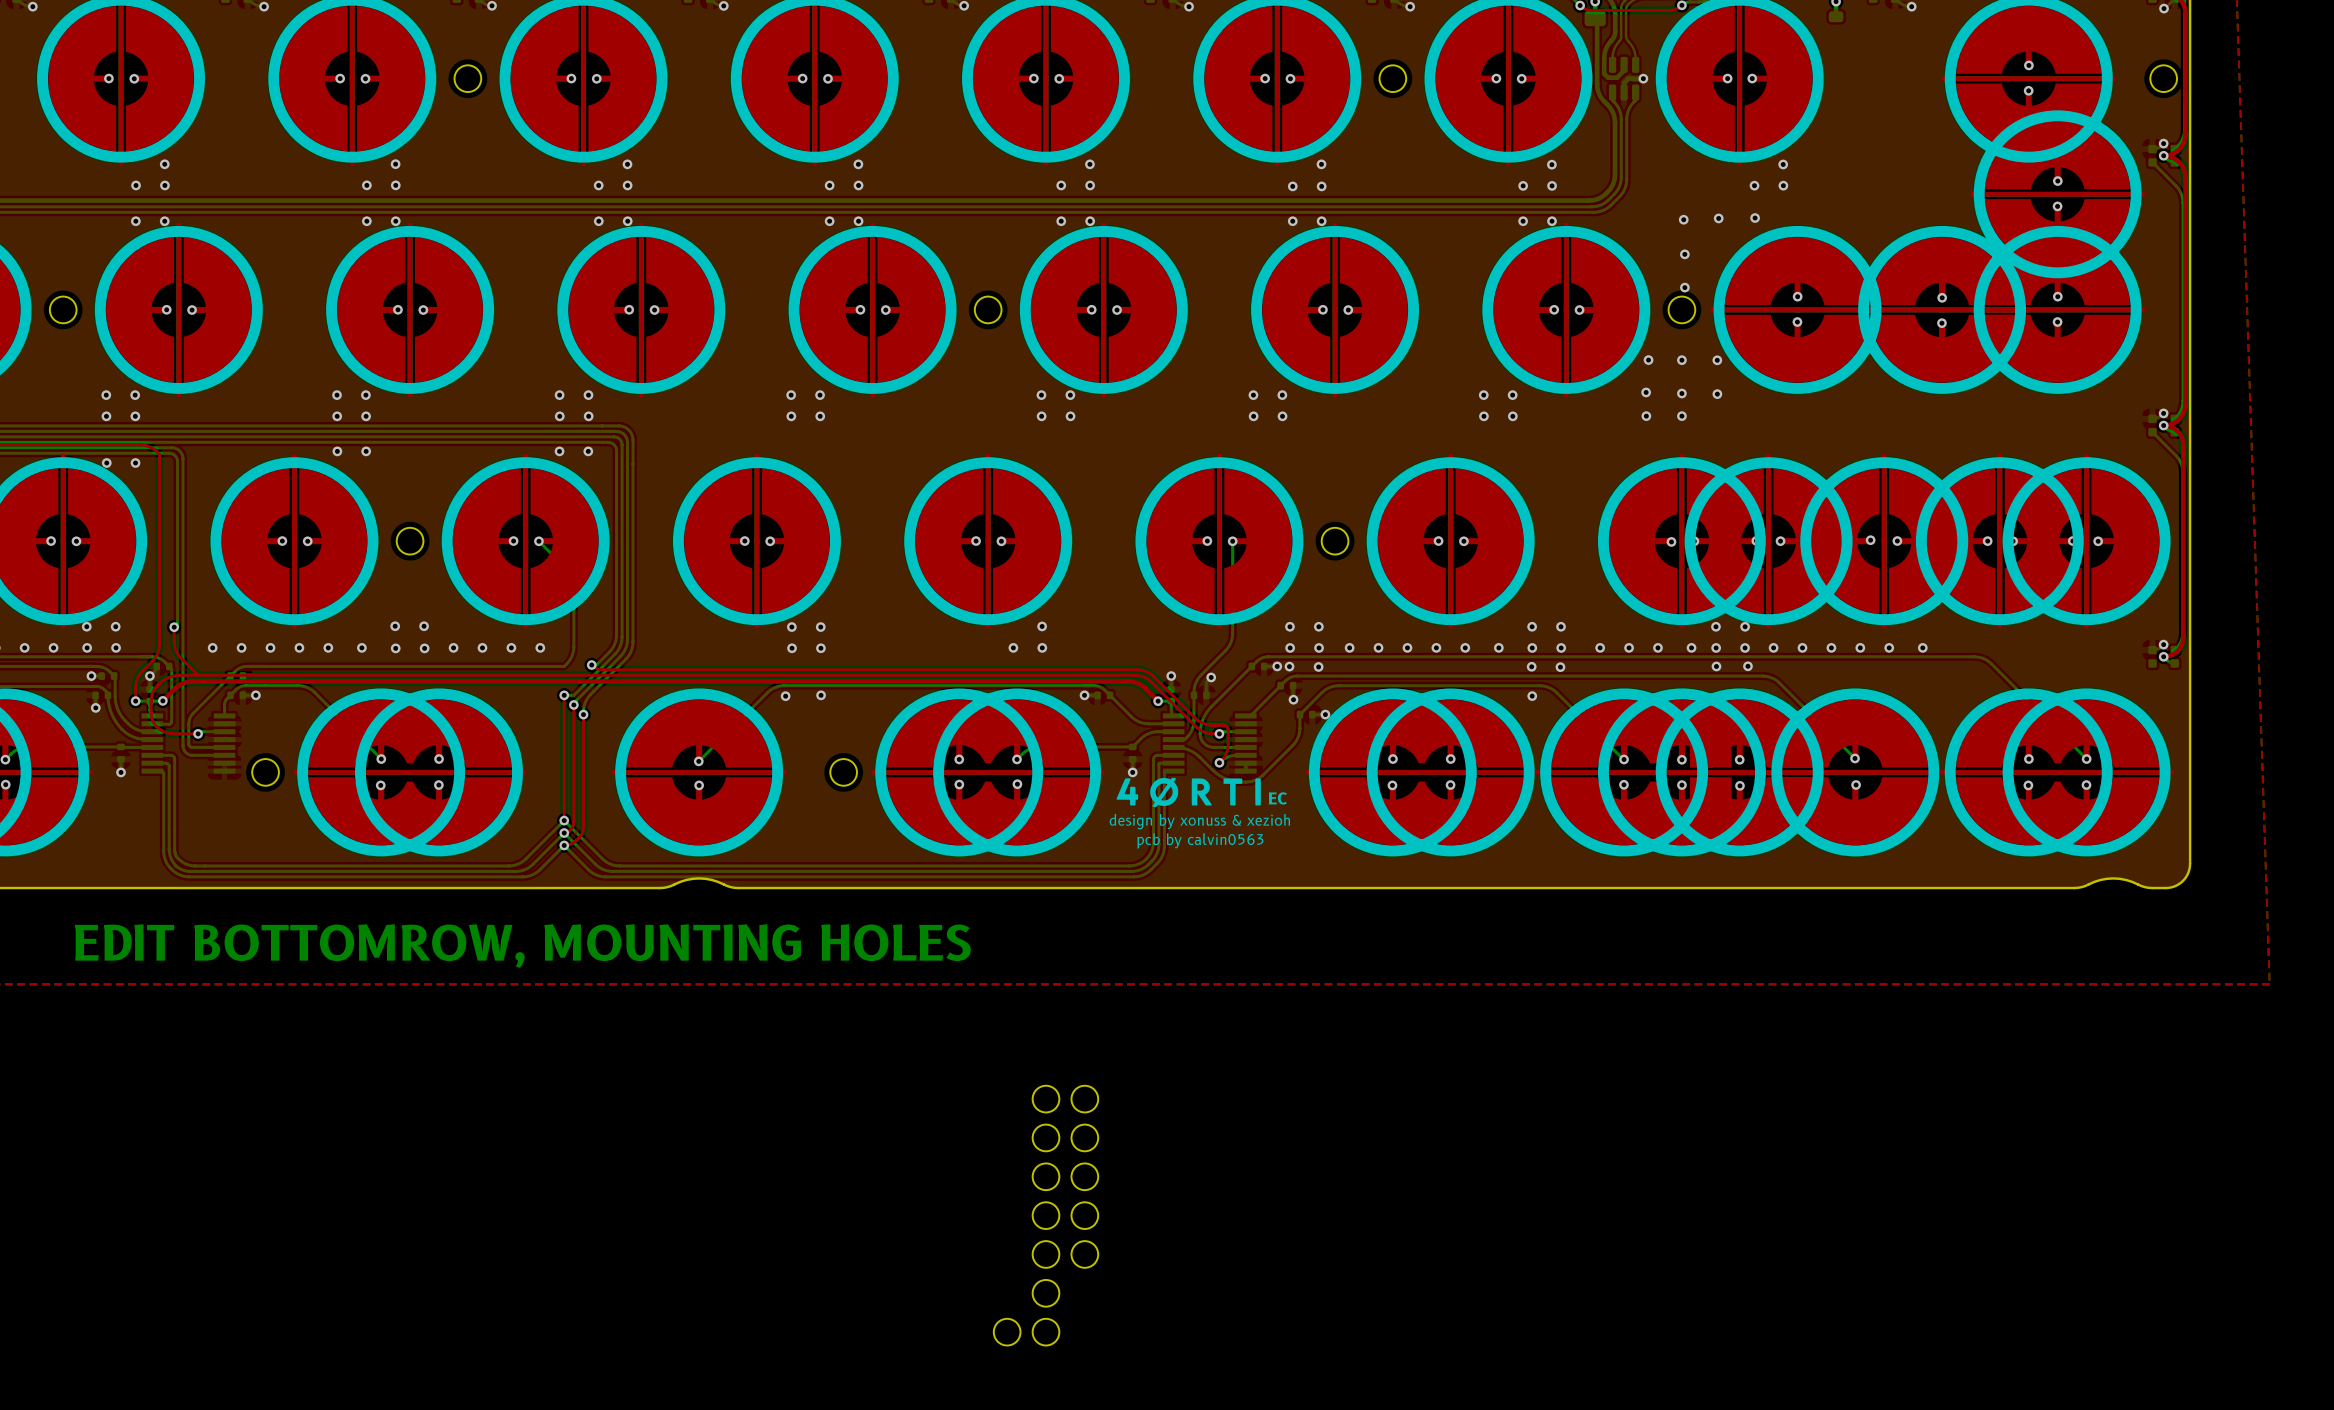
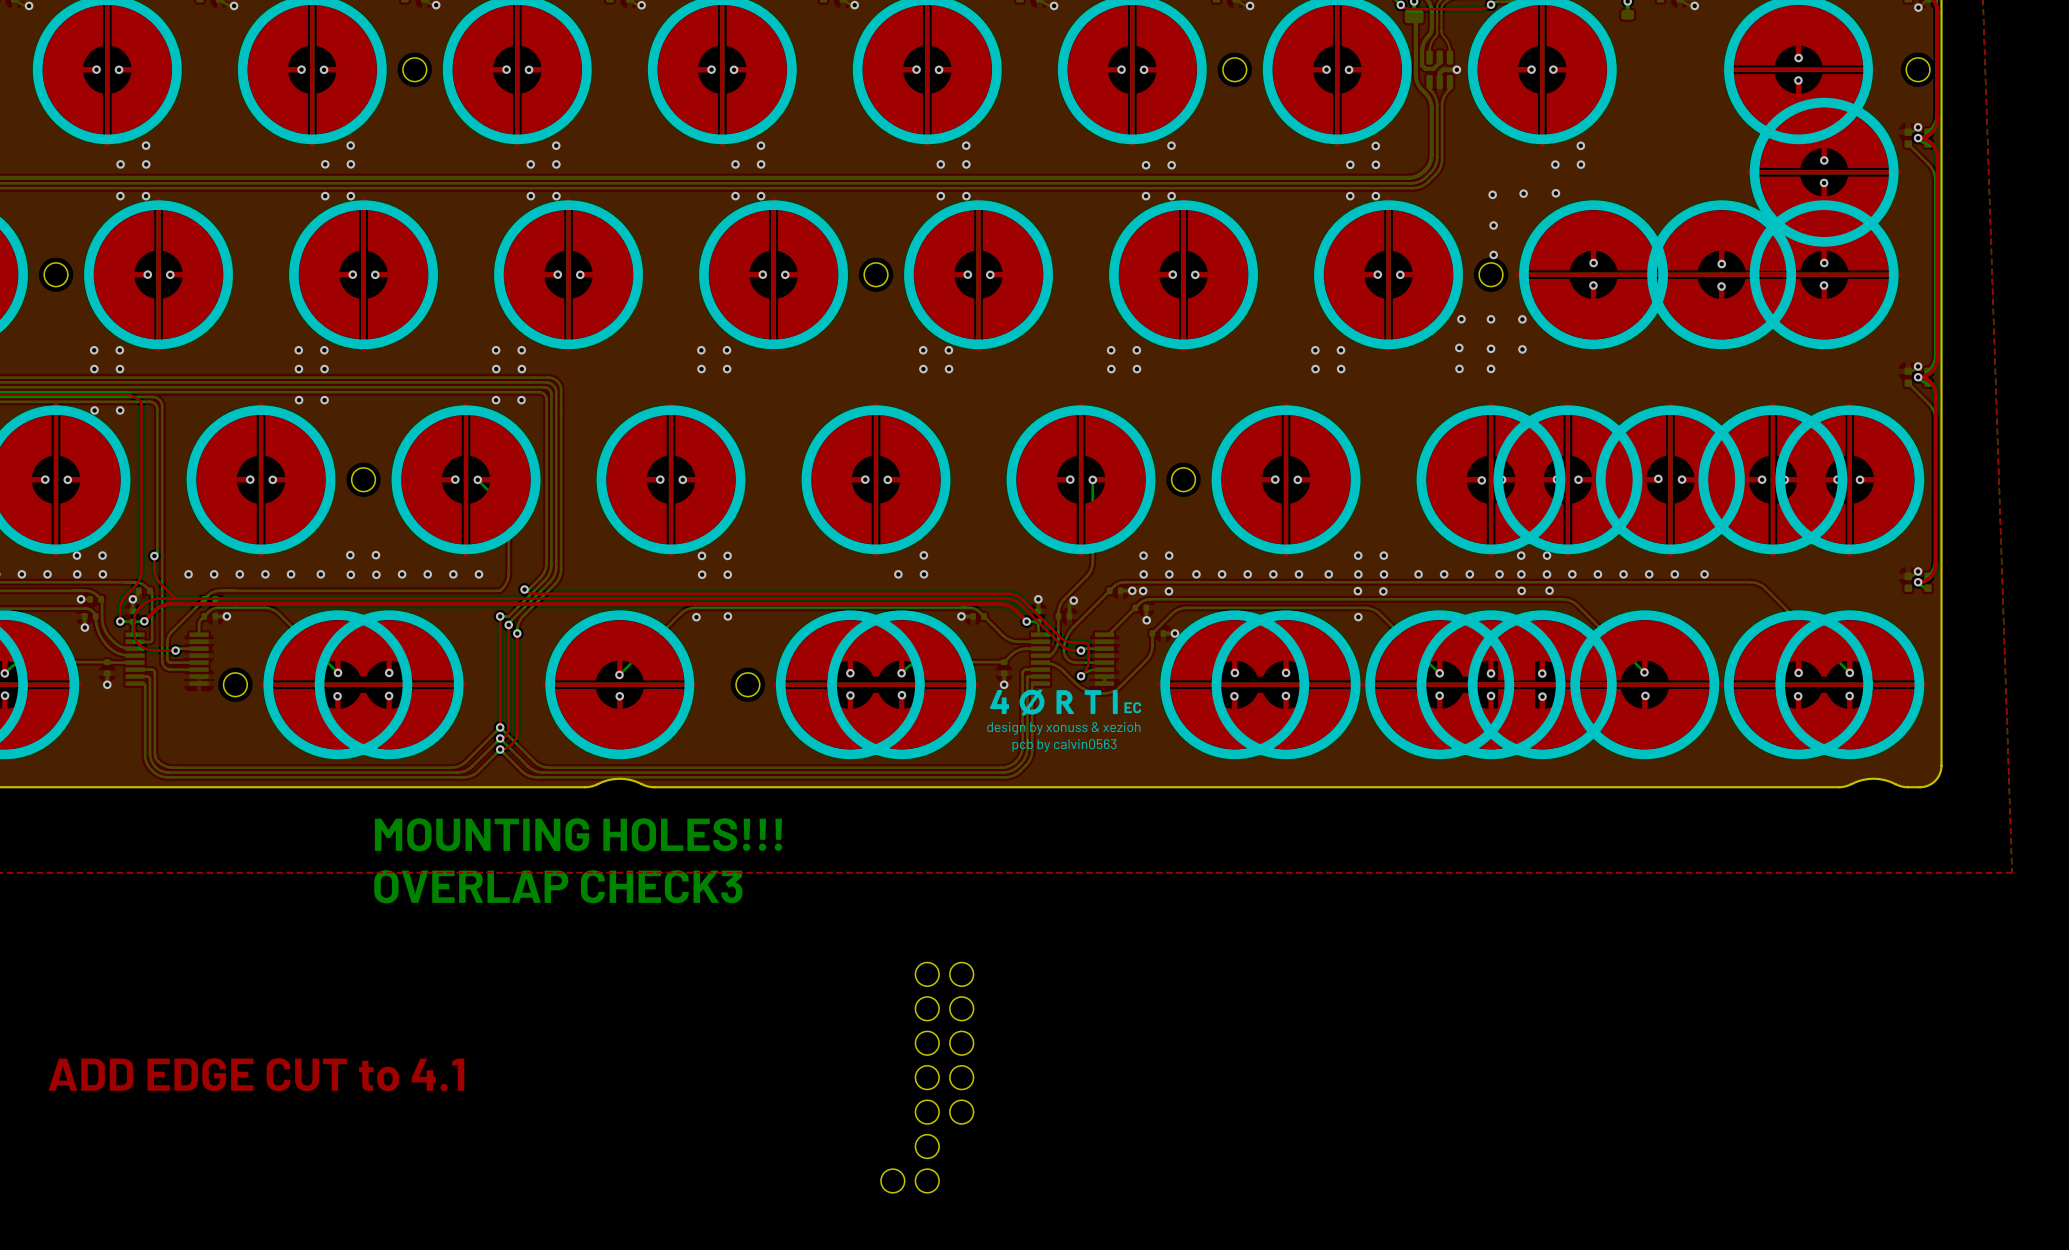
text: none -> MOUNTING HOLES!!! (578, 834)
text: EDIT BOTTOMROW, MOUNTING HOLES (522, 946) -> none
text: none -> OVERLAP CHECK3 (558, 886)
text: none -> ADD EDGE CUT to 4.1 (256, 1074)

